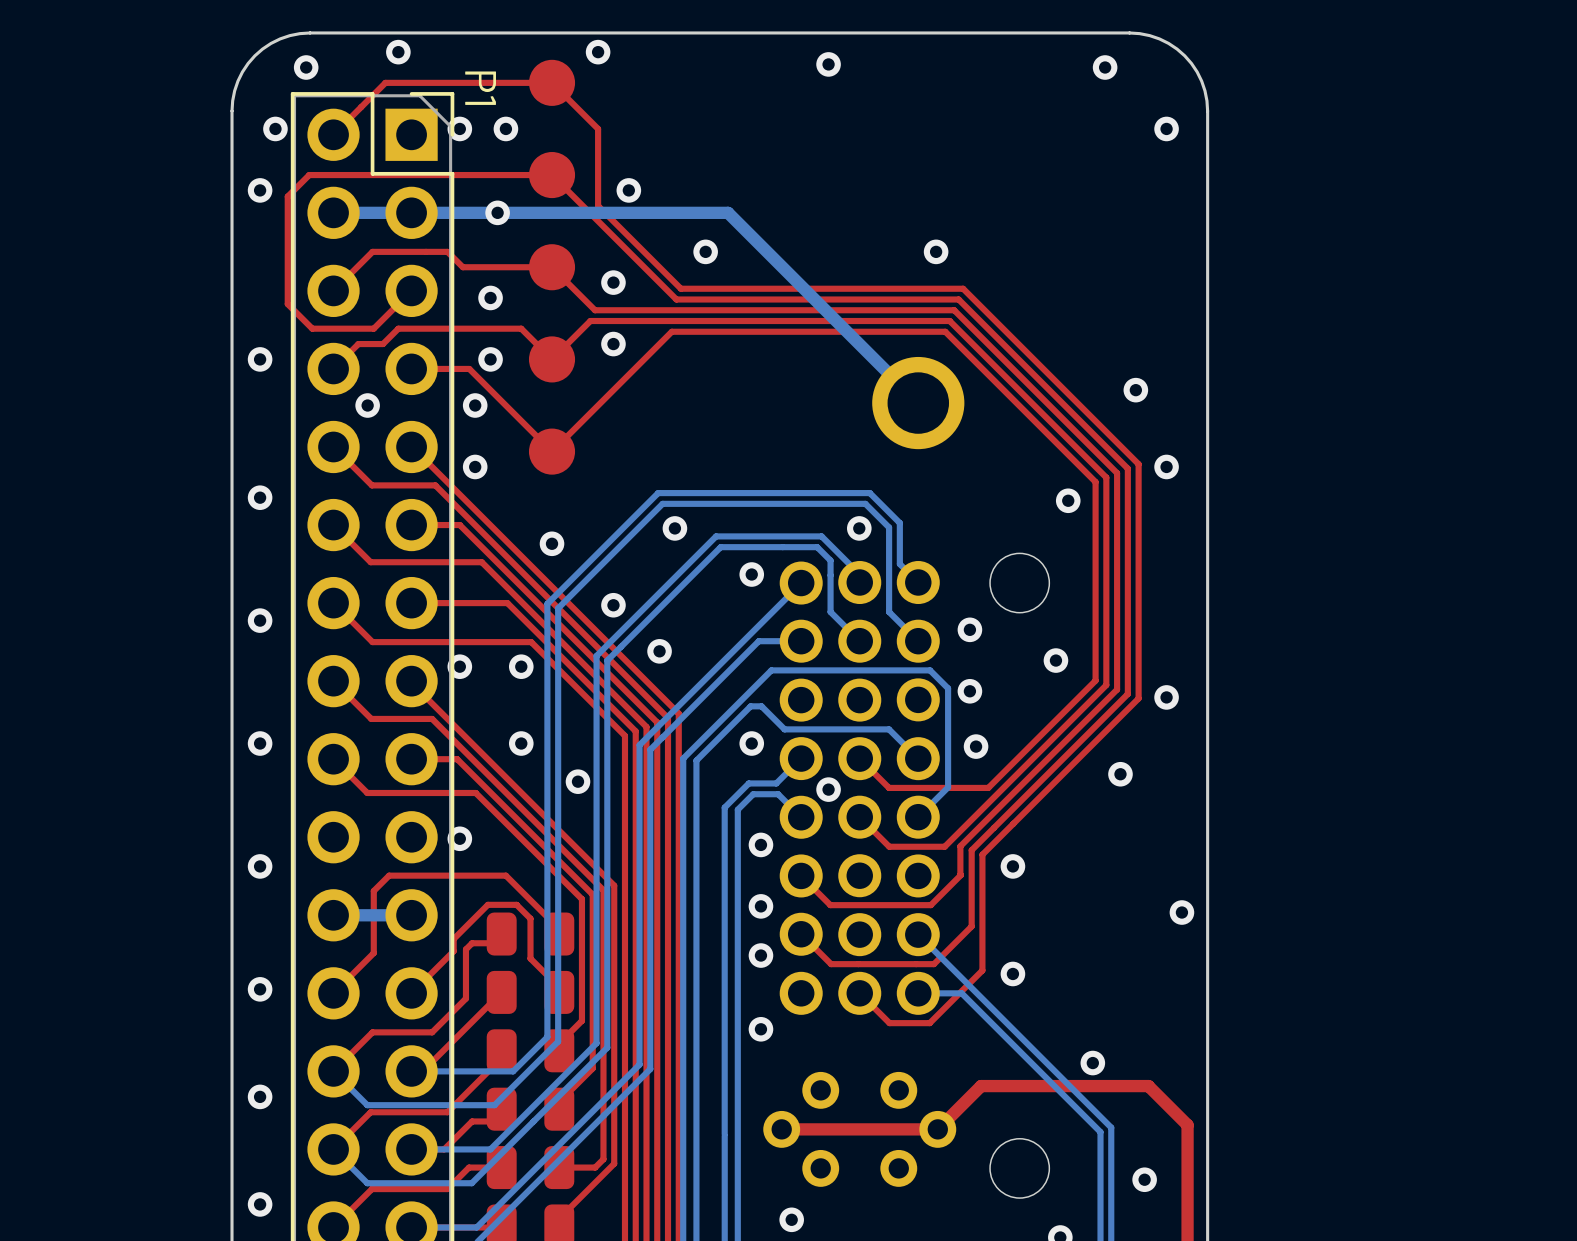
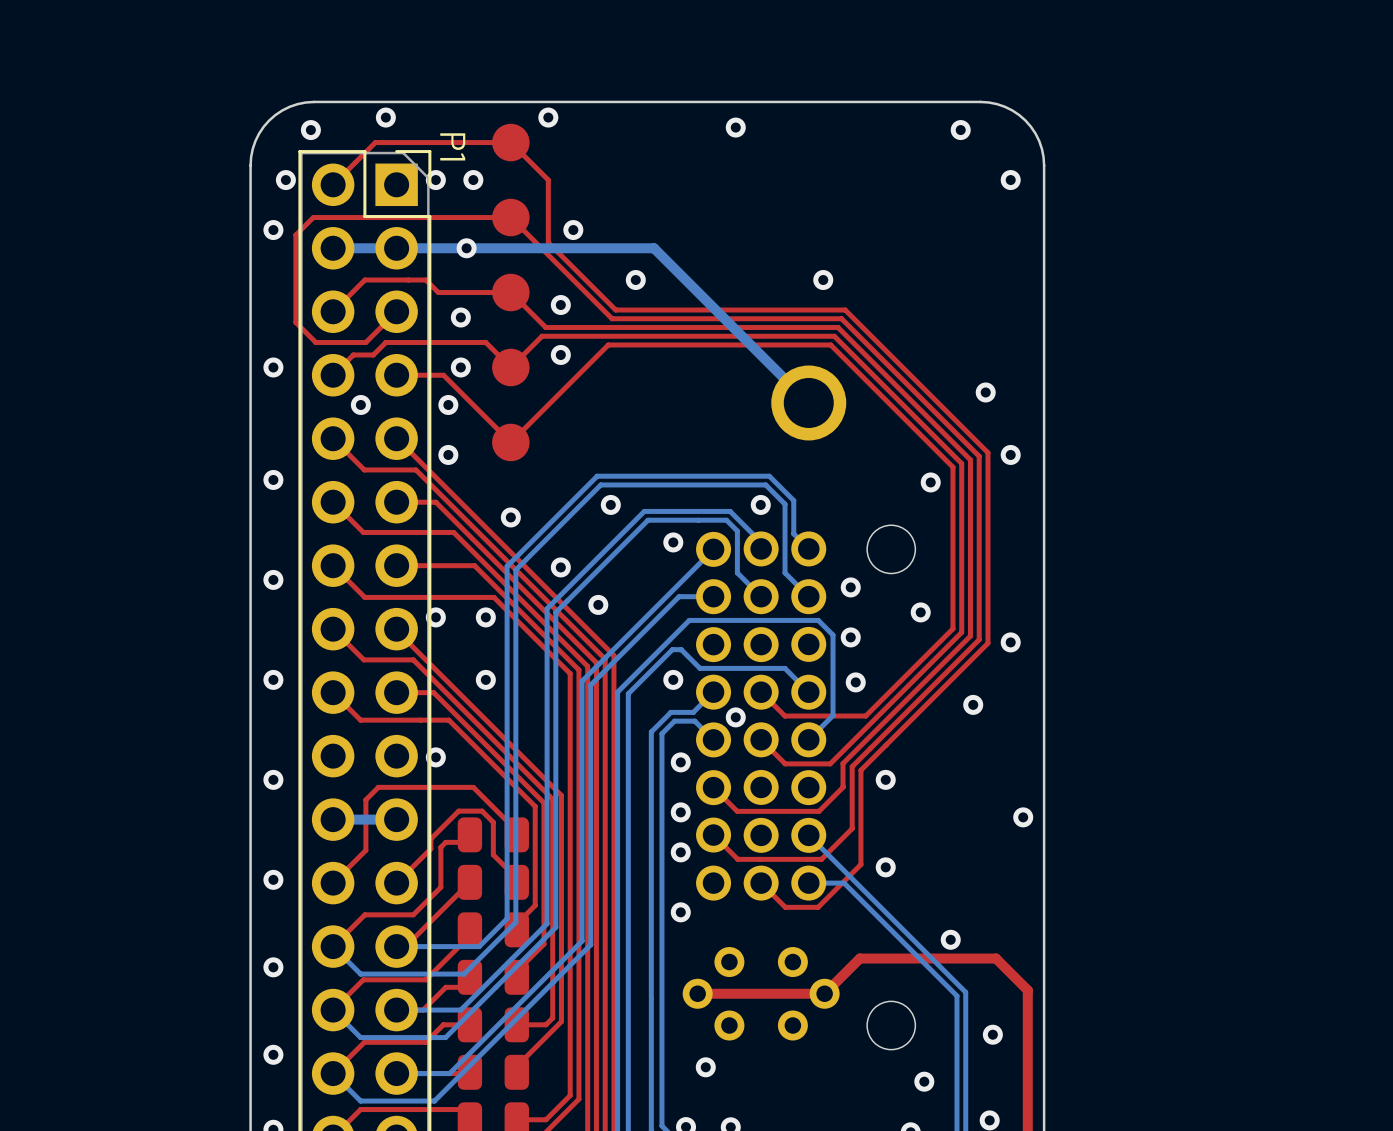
via: (577, 781) -> none

